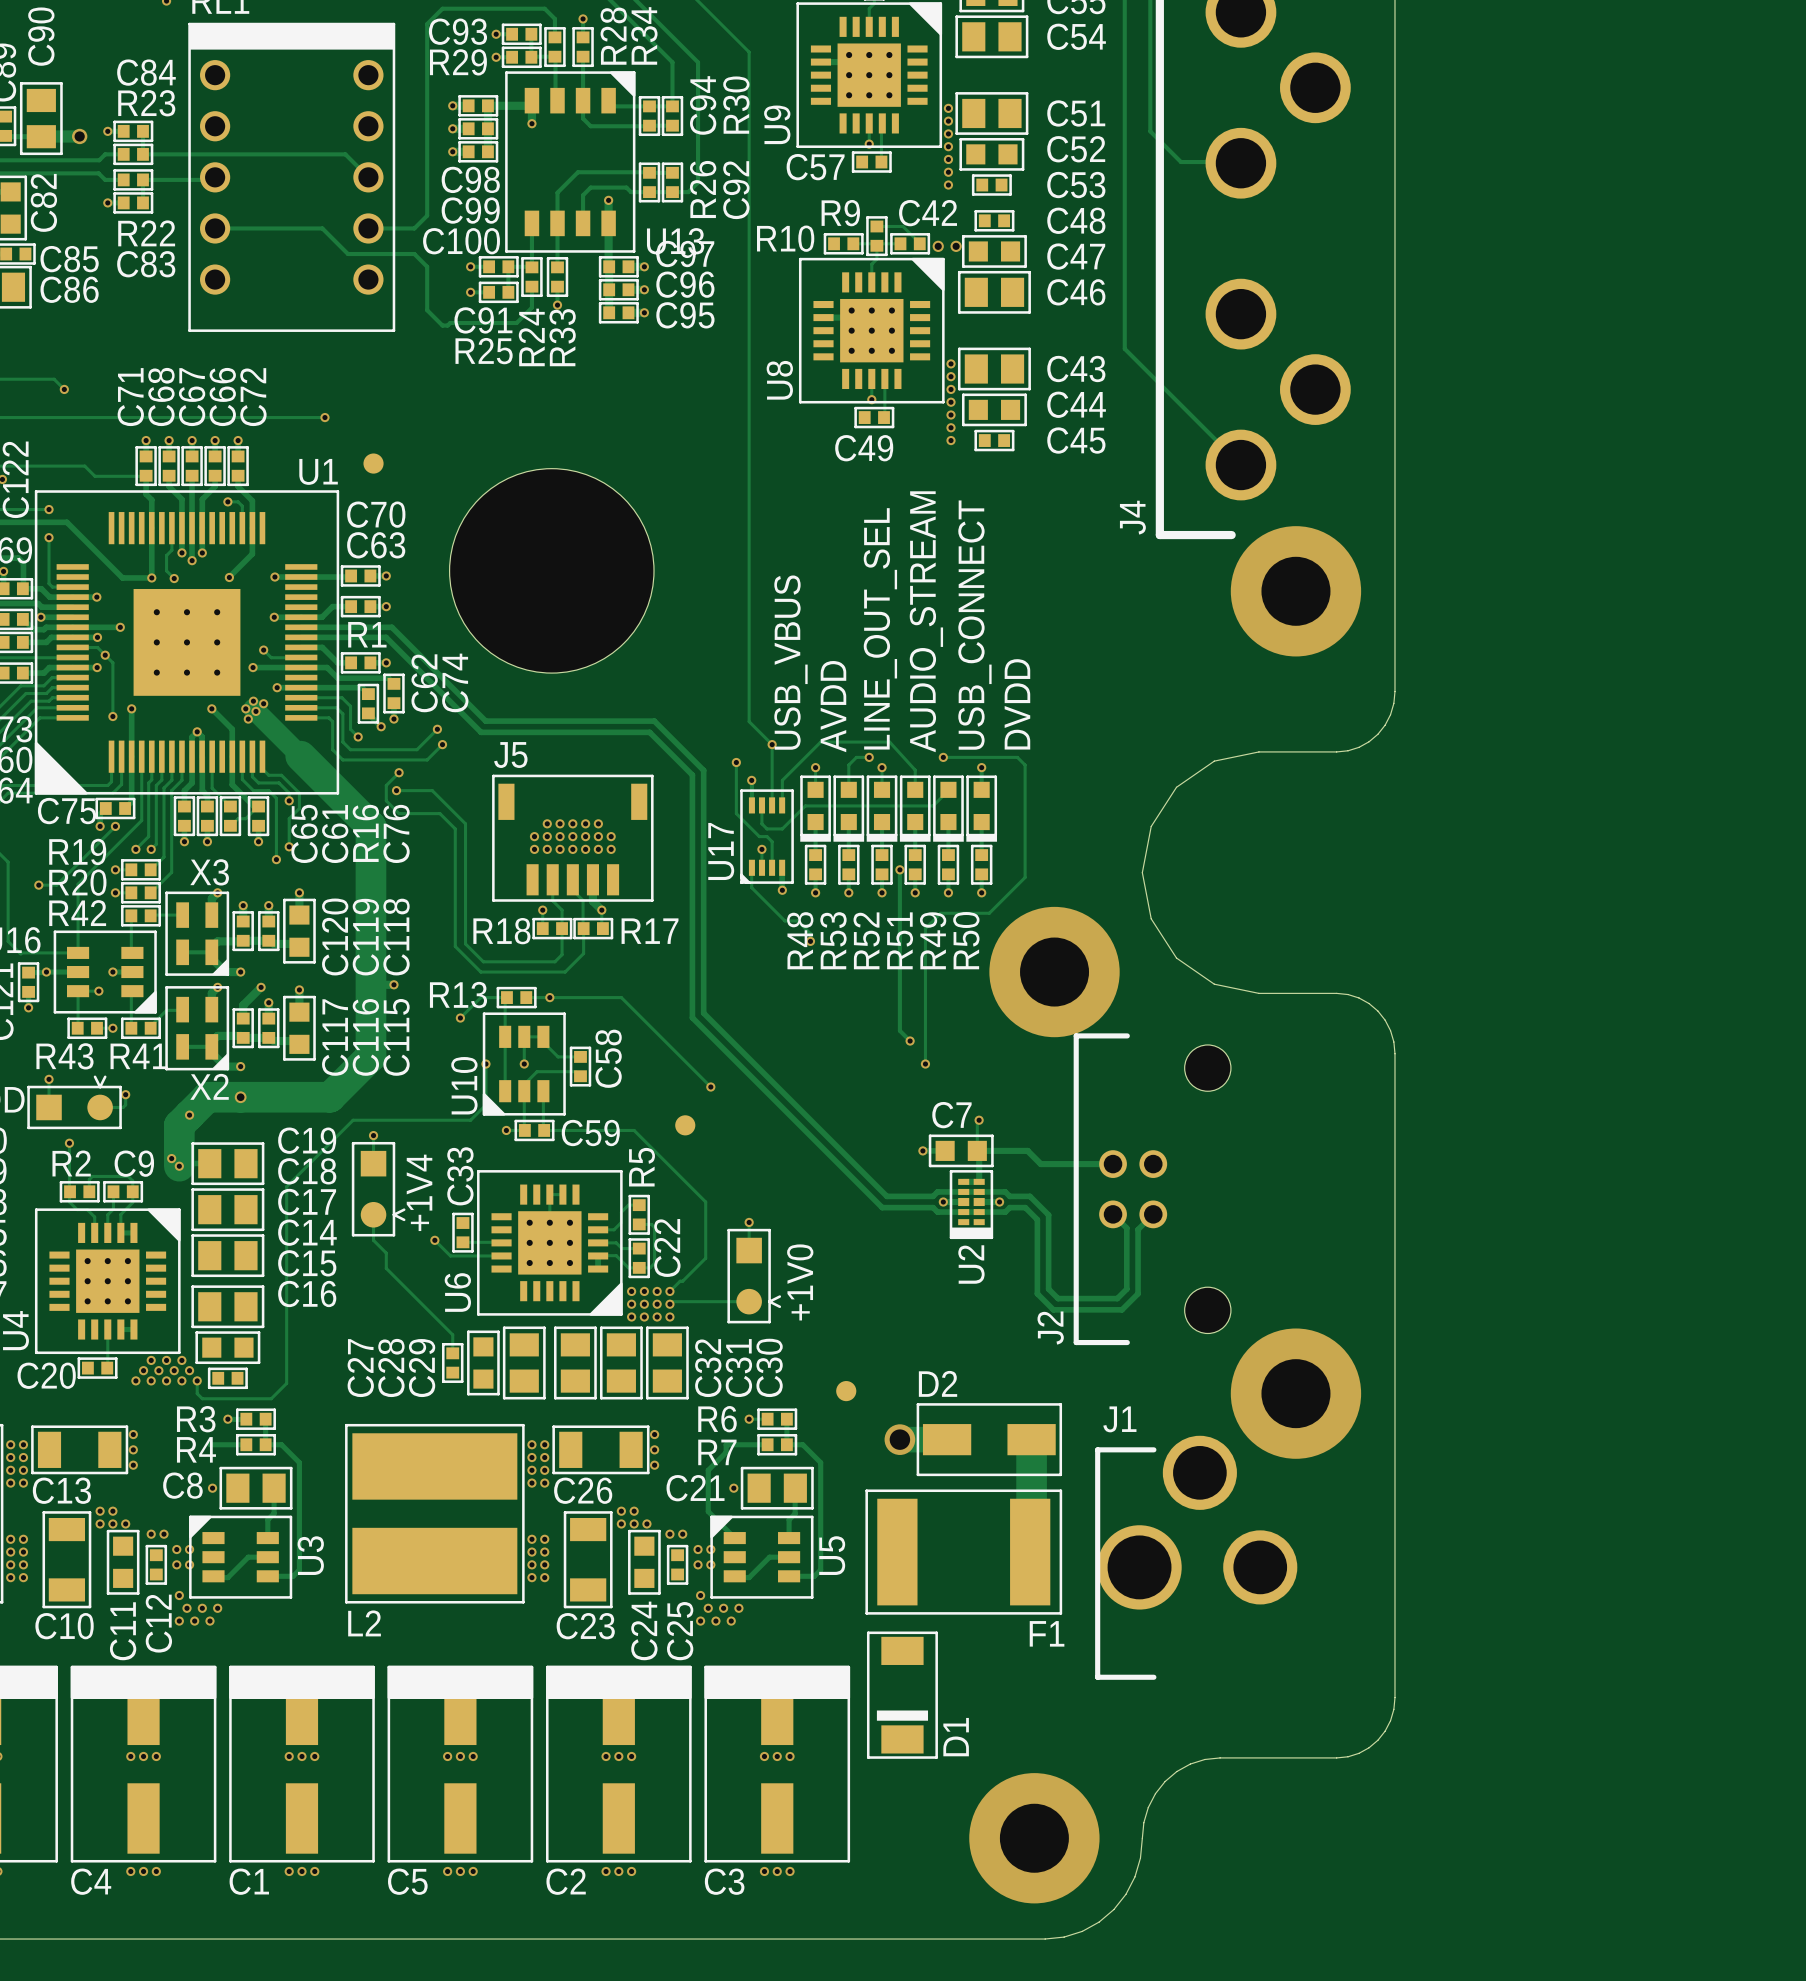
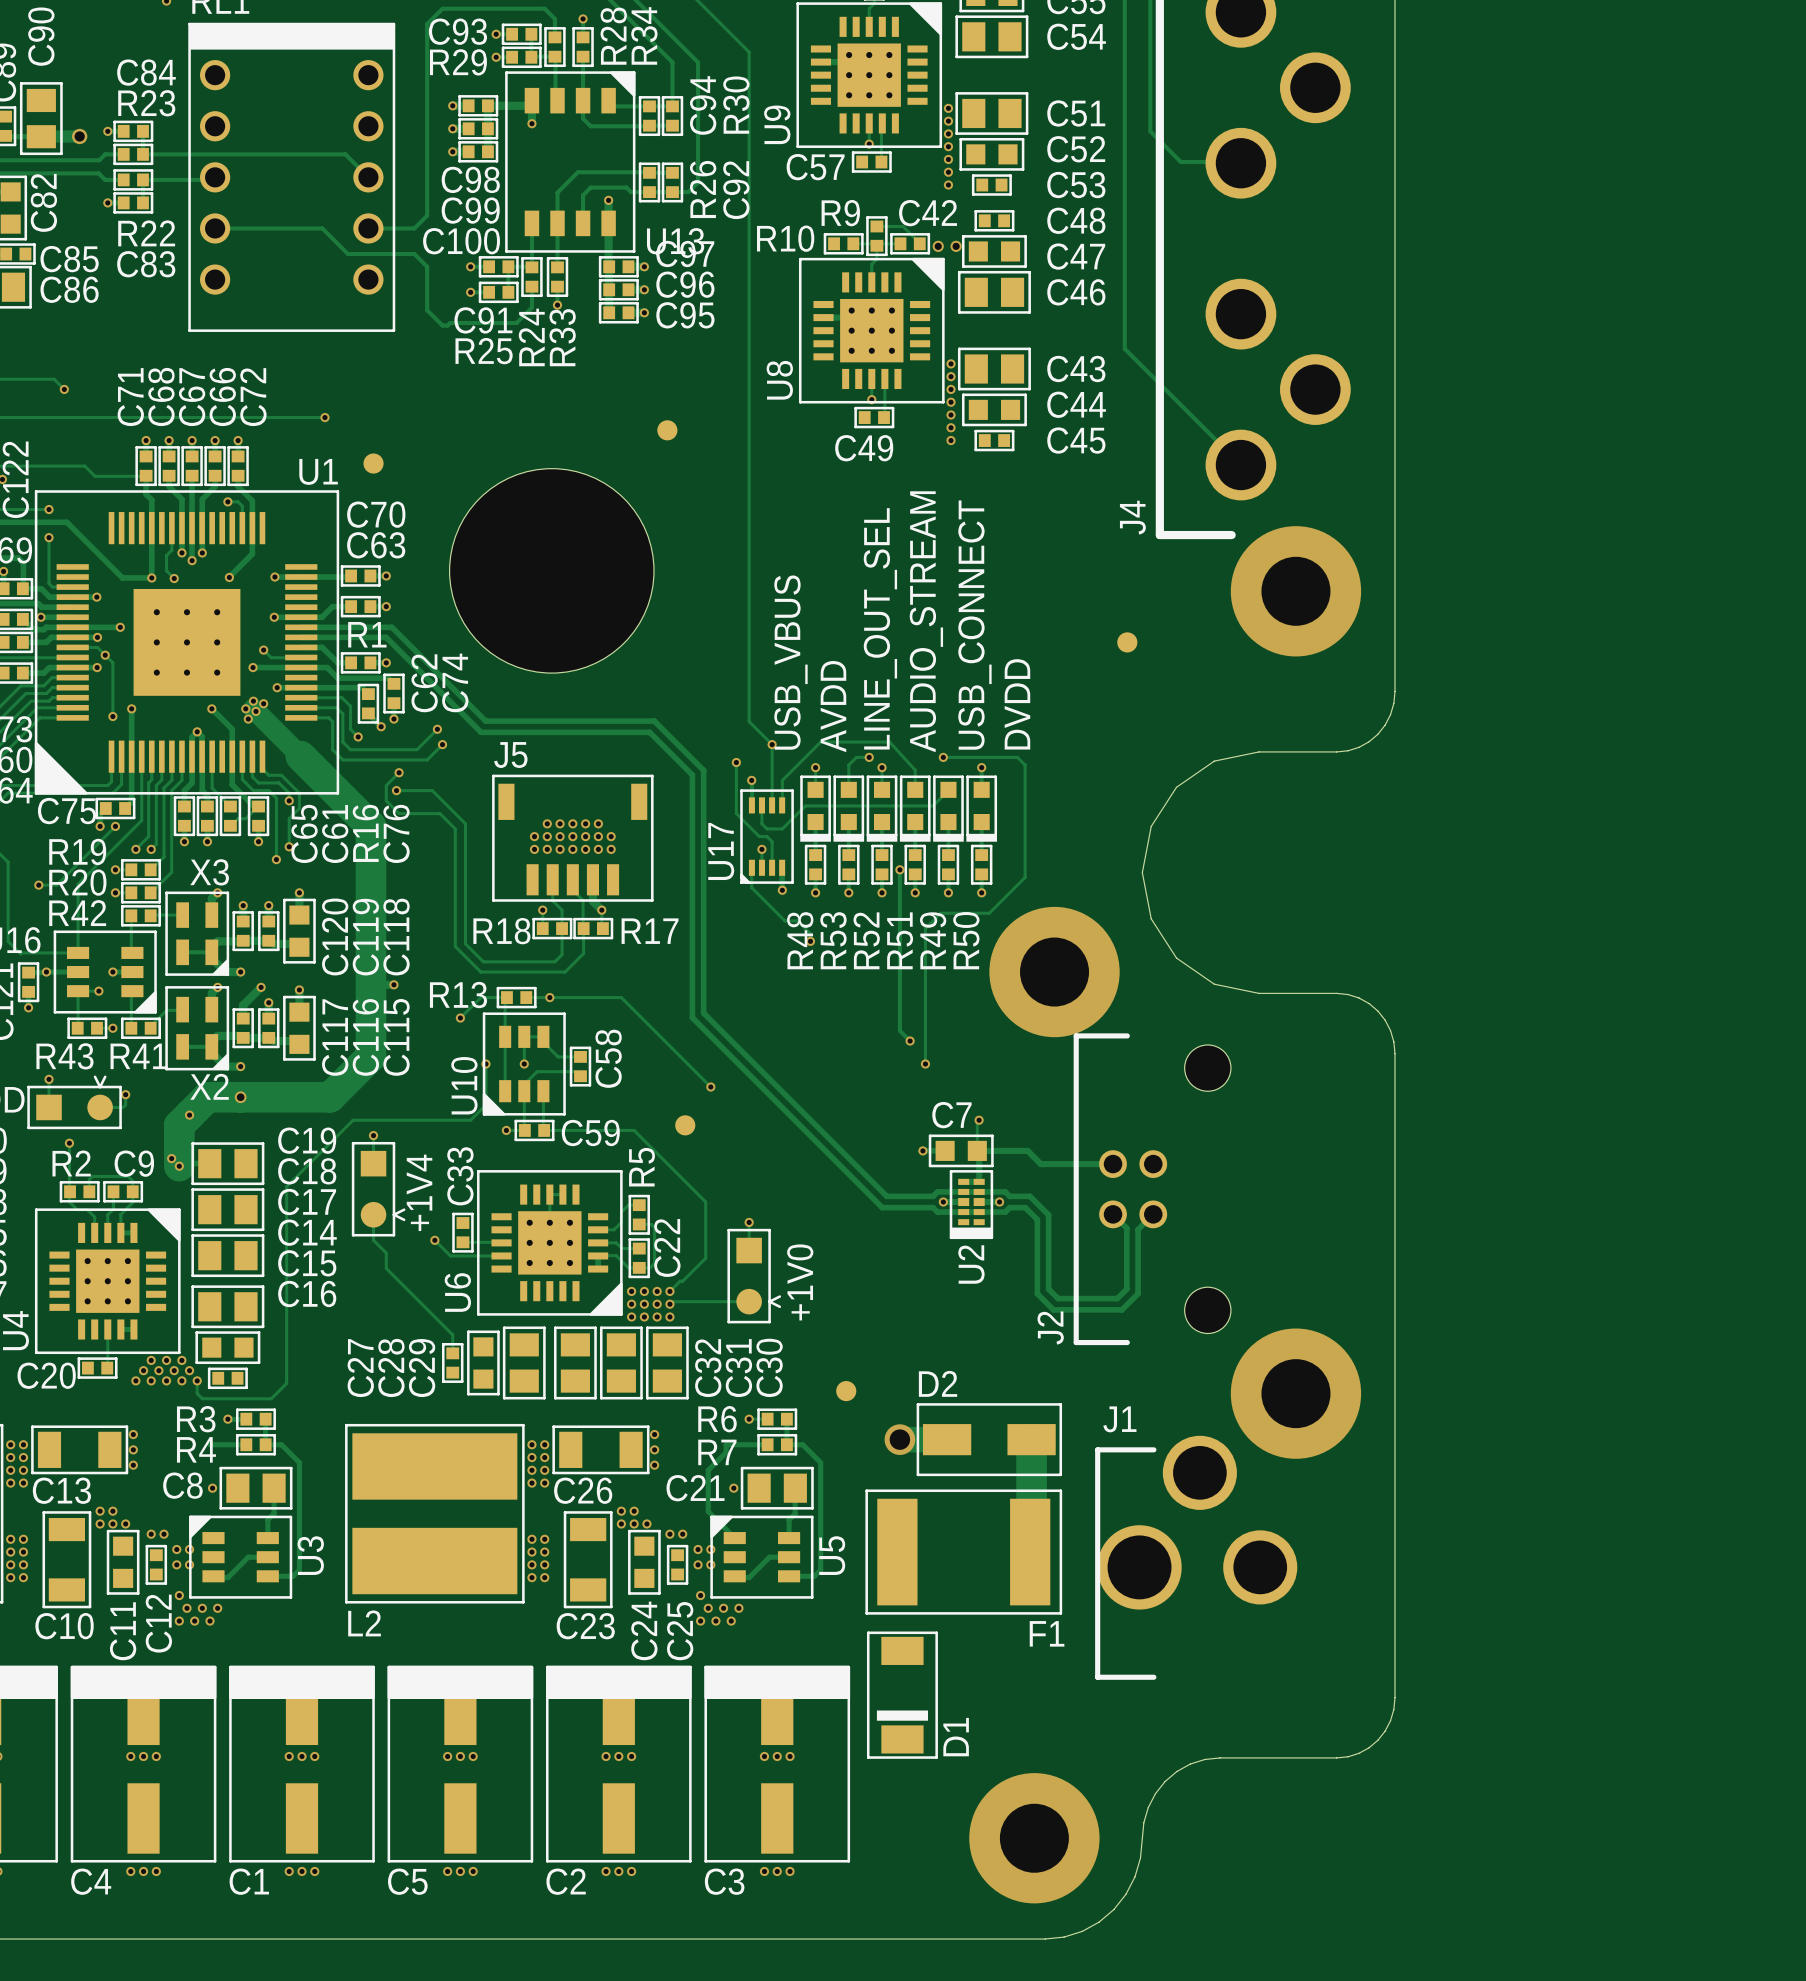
part: none -> (667, 430)
part: none -> (1127, 642)

